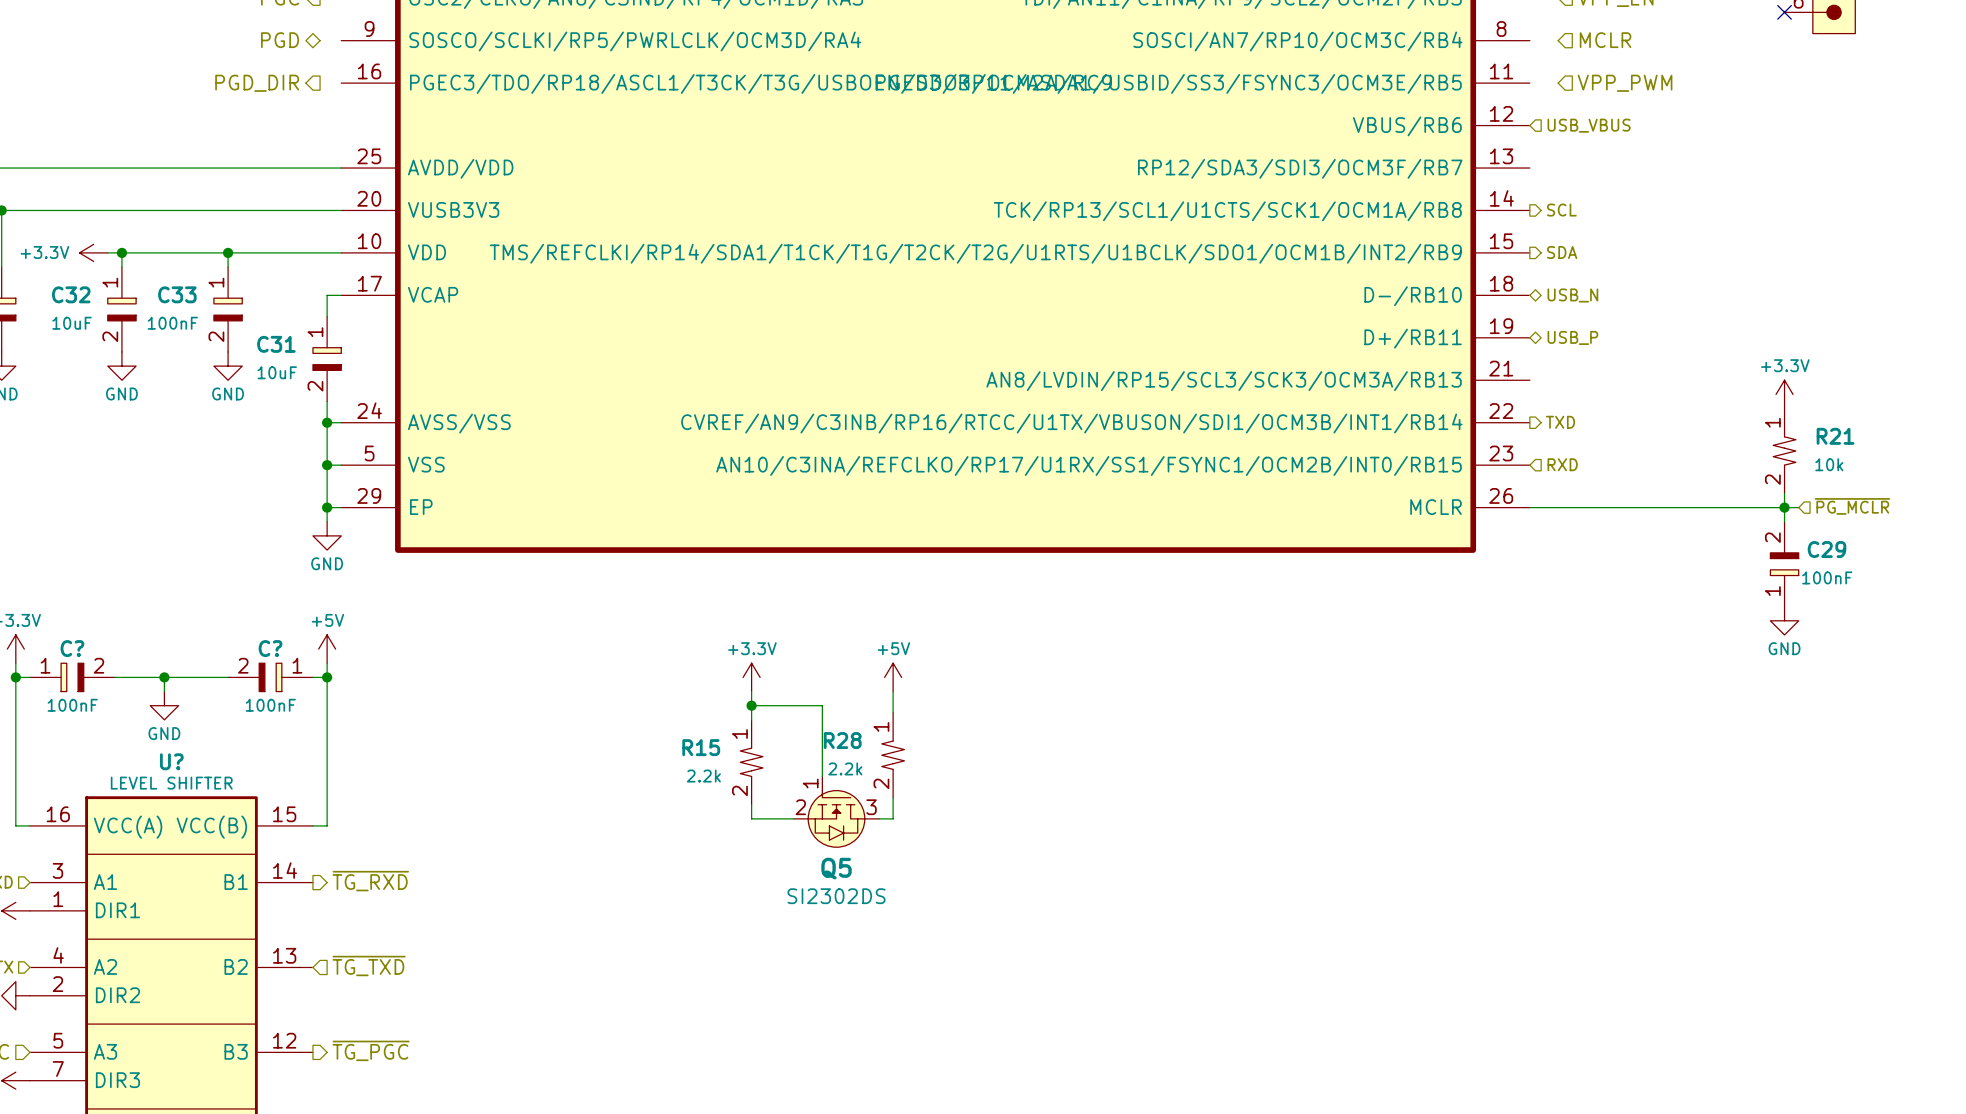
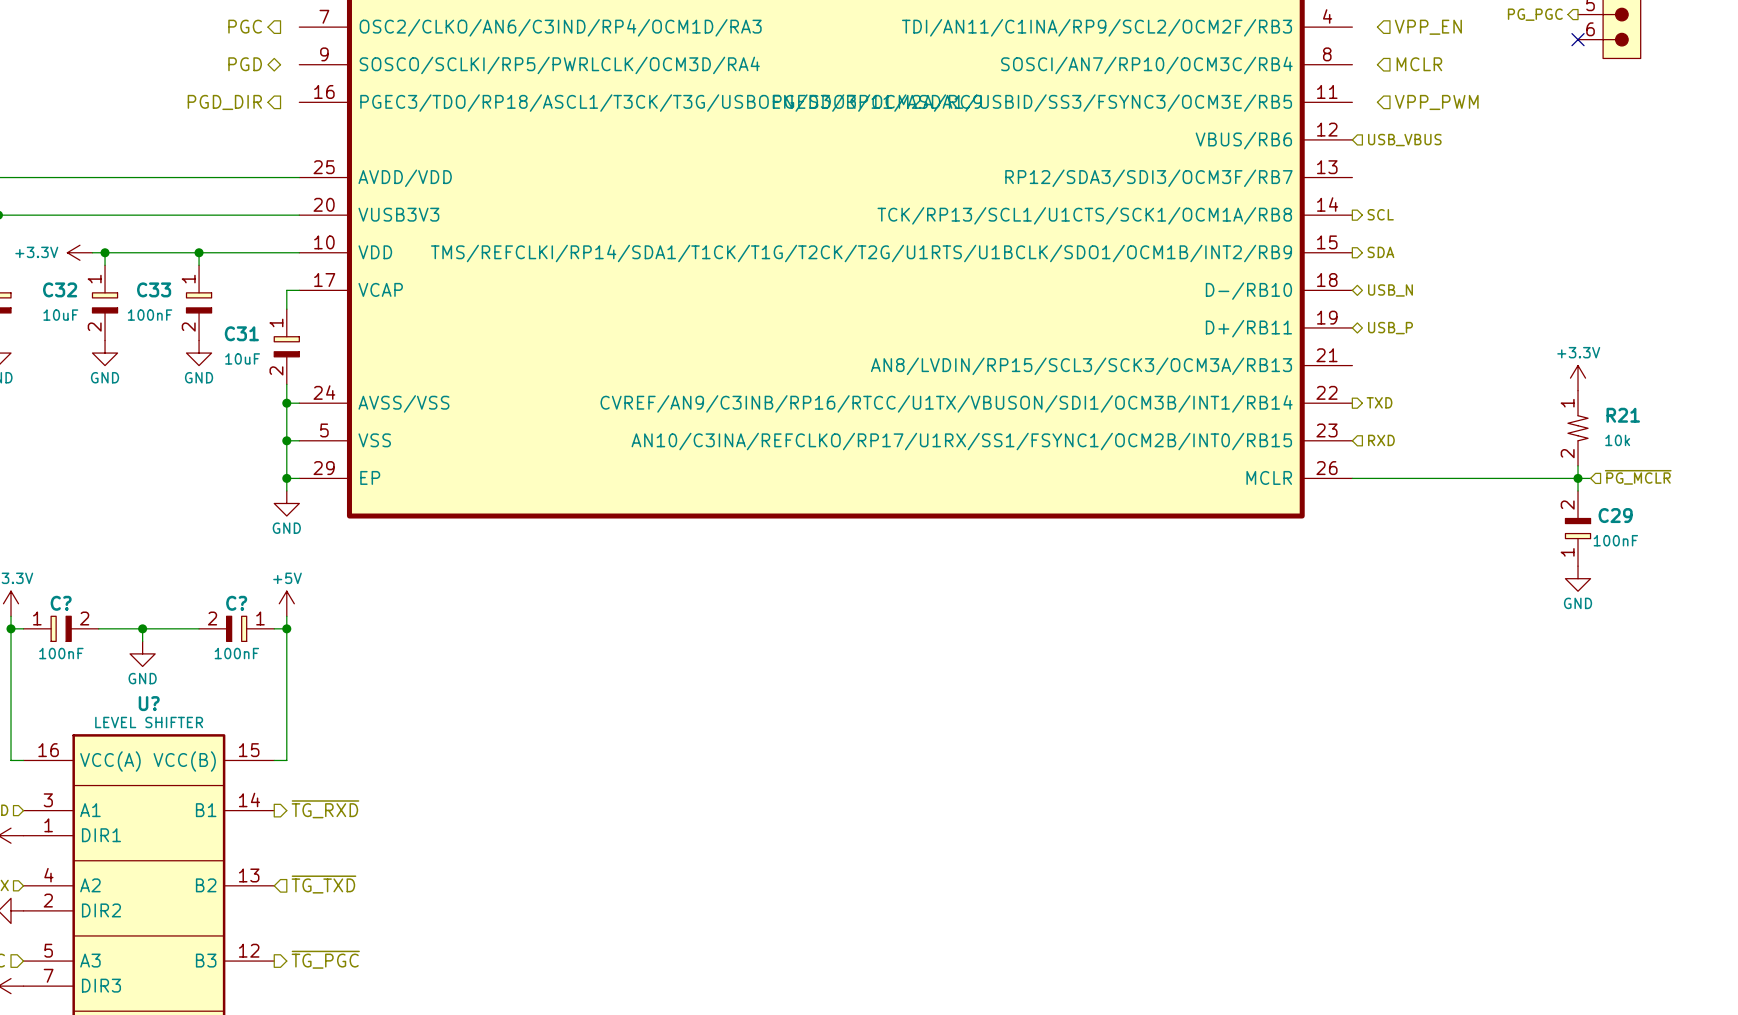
power symbol: +3.3V (751, 677) -> none
power symbol: +5V (893, 677) -> none
wire: (751, 691) (751, 719) -> none
wire: (893, 691) (893, 712) -> none
wire: (751, 705) (822, 705) (822, 776) -> none
junction: (751, 705) -> none
R28: 2.2k (893, 755) -> none
R15: 2.2k (751, 762) -> none
wire: (893, 797) (893, 818) (878, 818) -> none
wire: (751, 804) (751, 818) (794, 818) -> none
Q5: SI2302DS (836, 811) -> none

